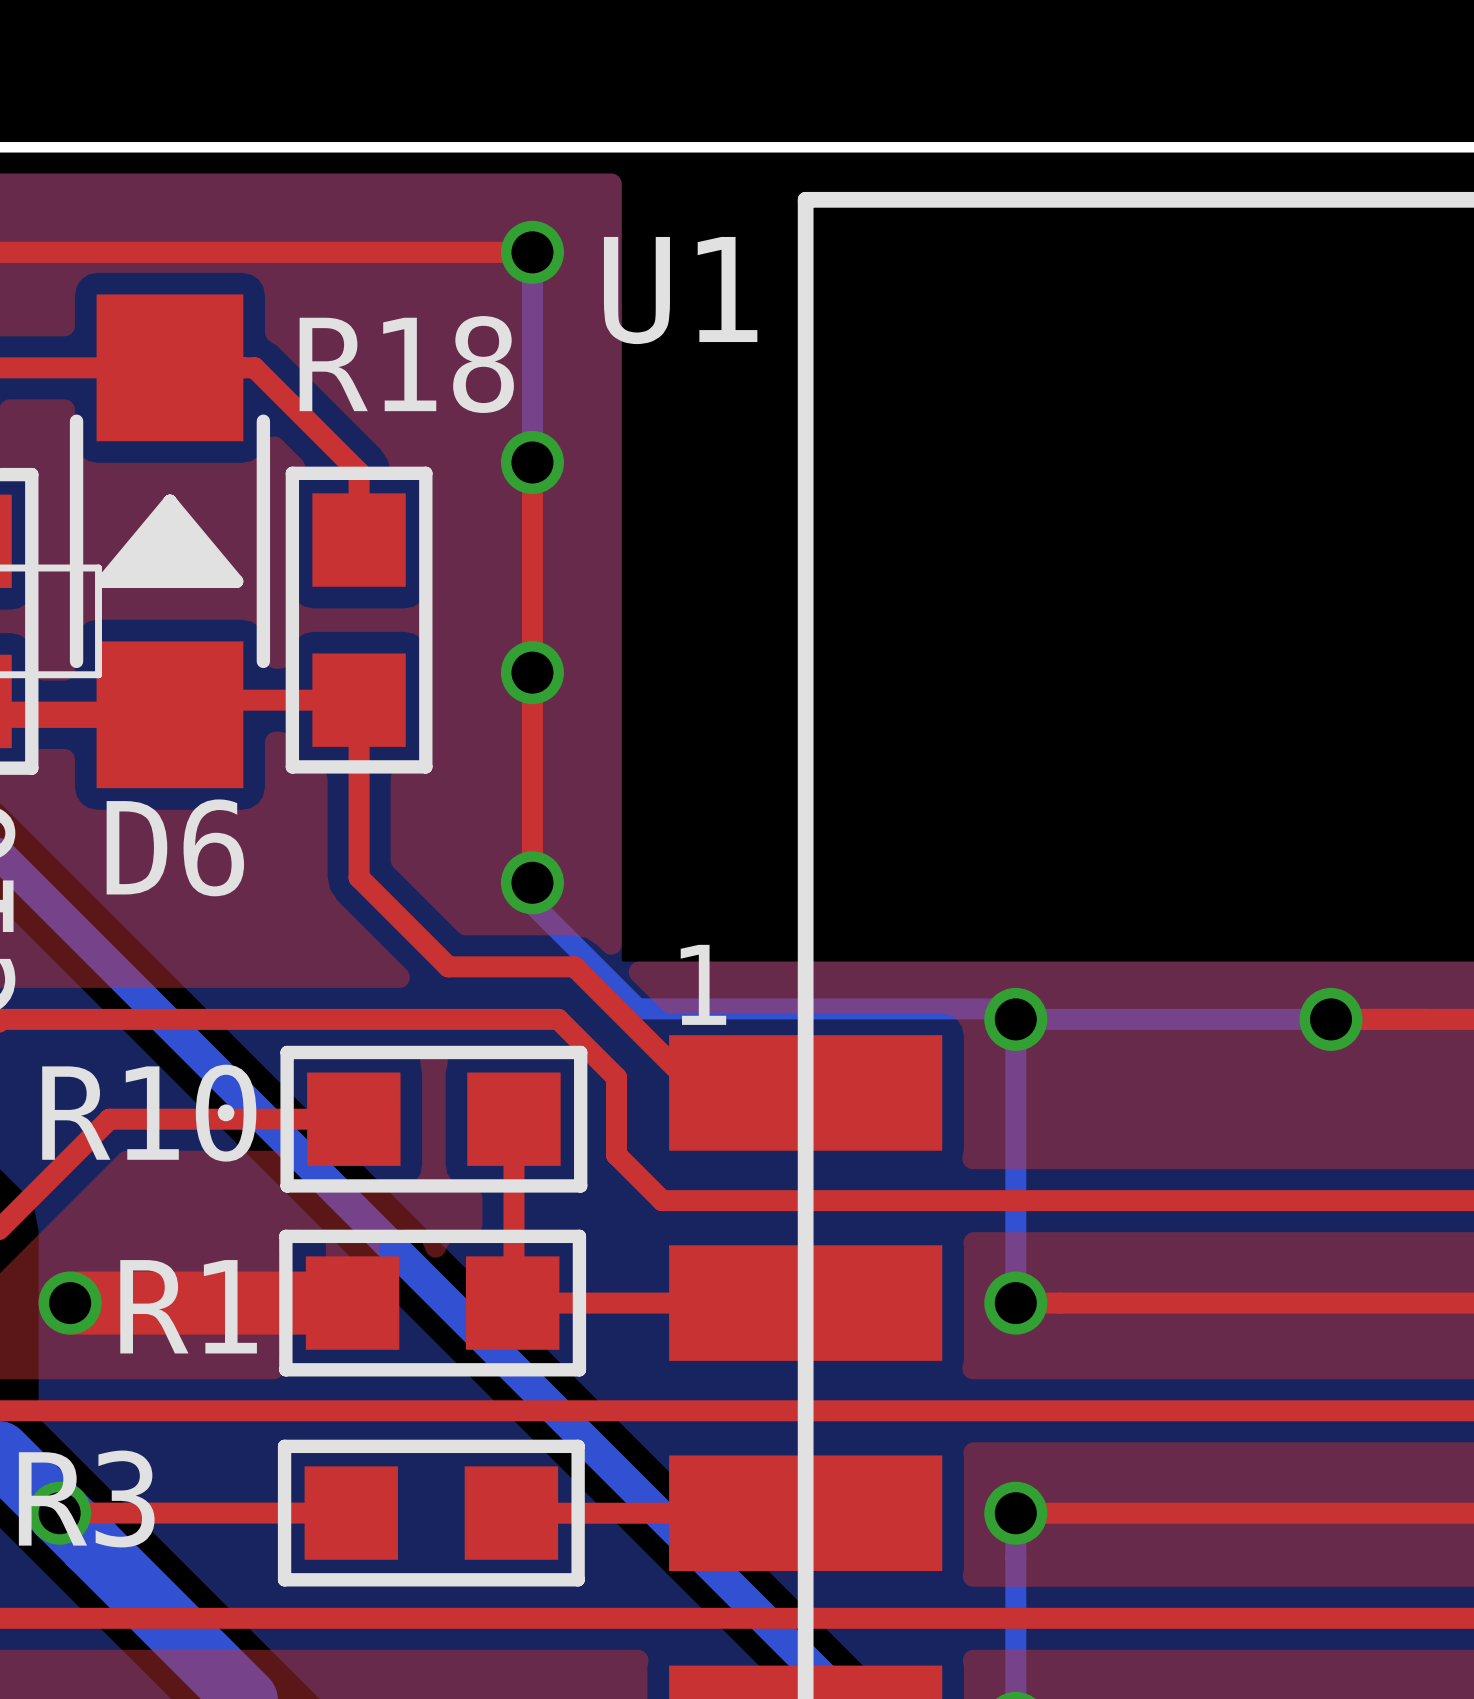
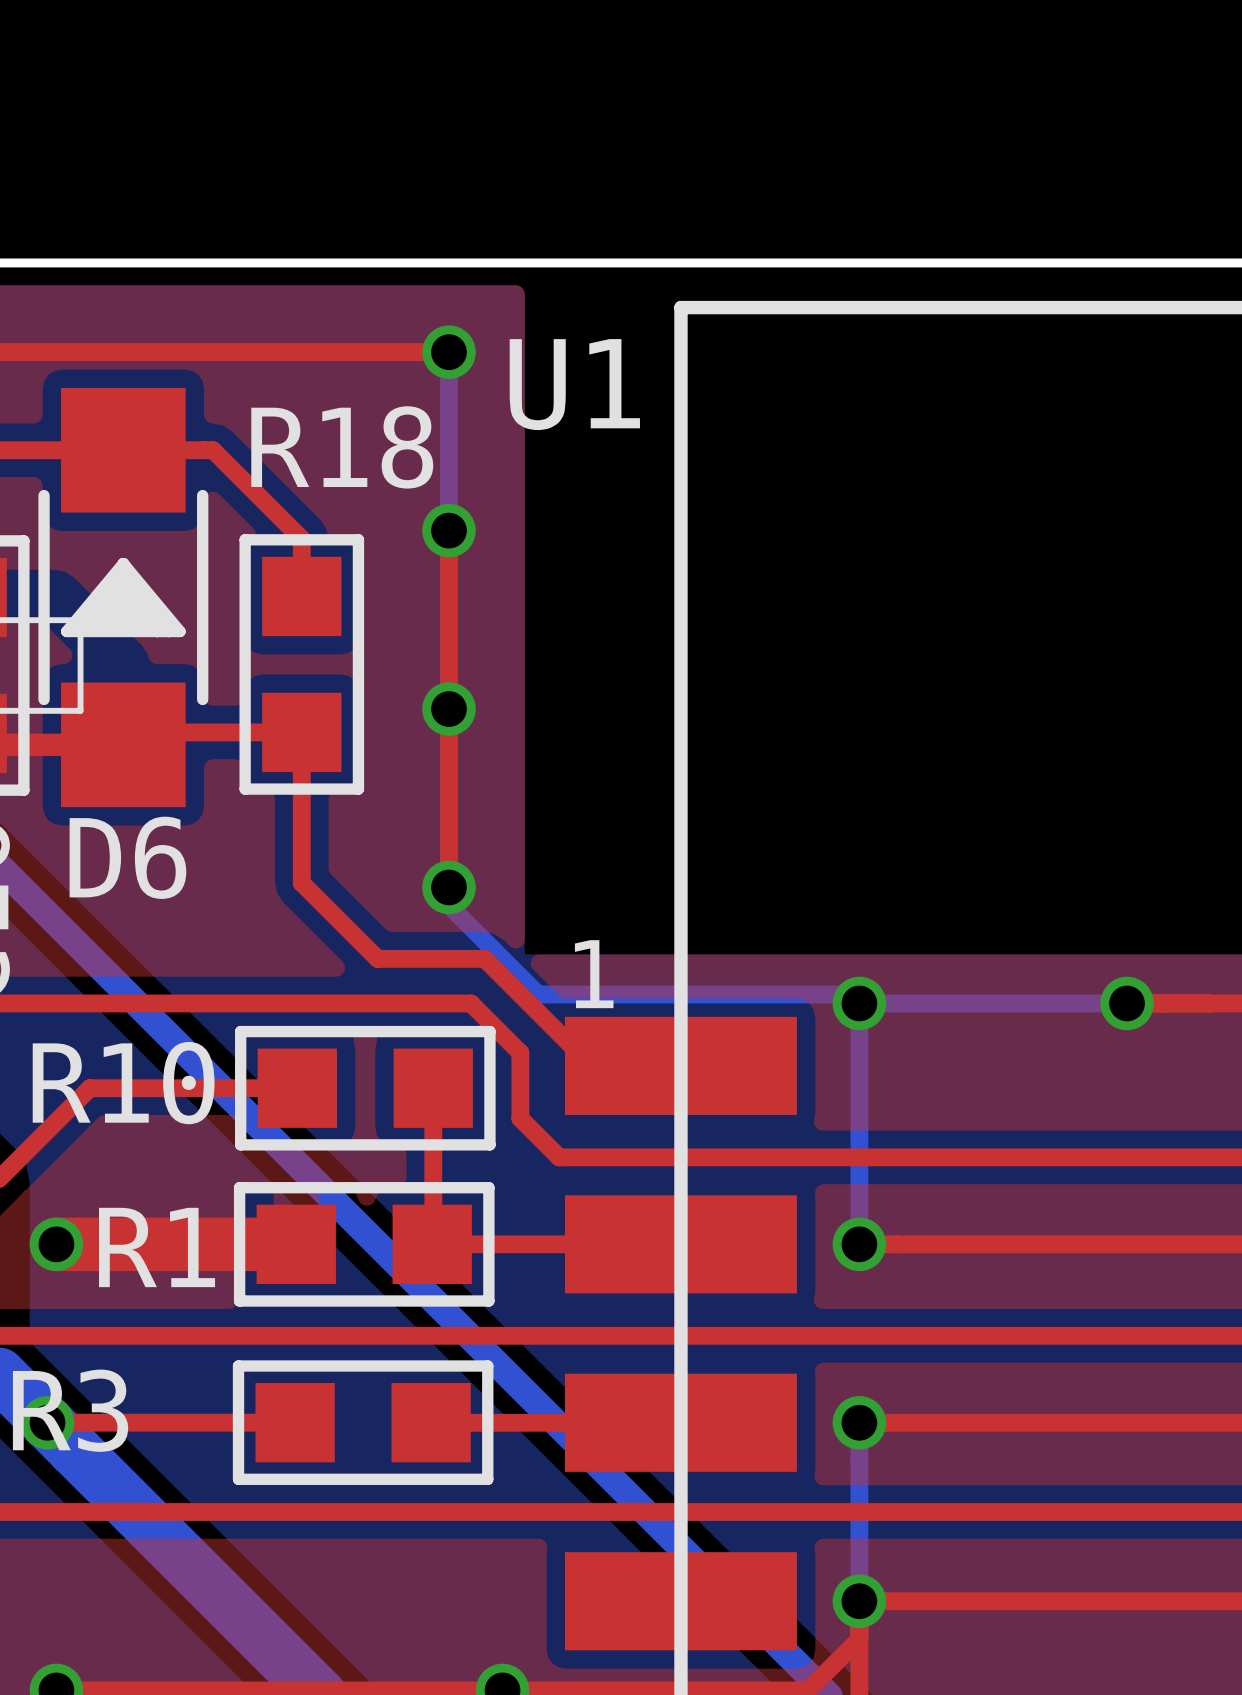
D6 position: (169, 541) -> (123, 597)

